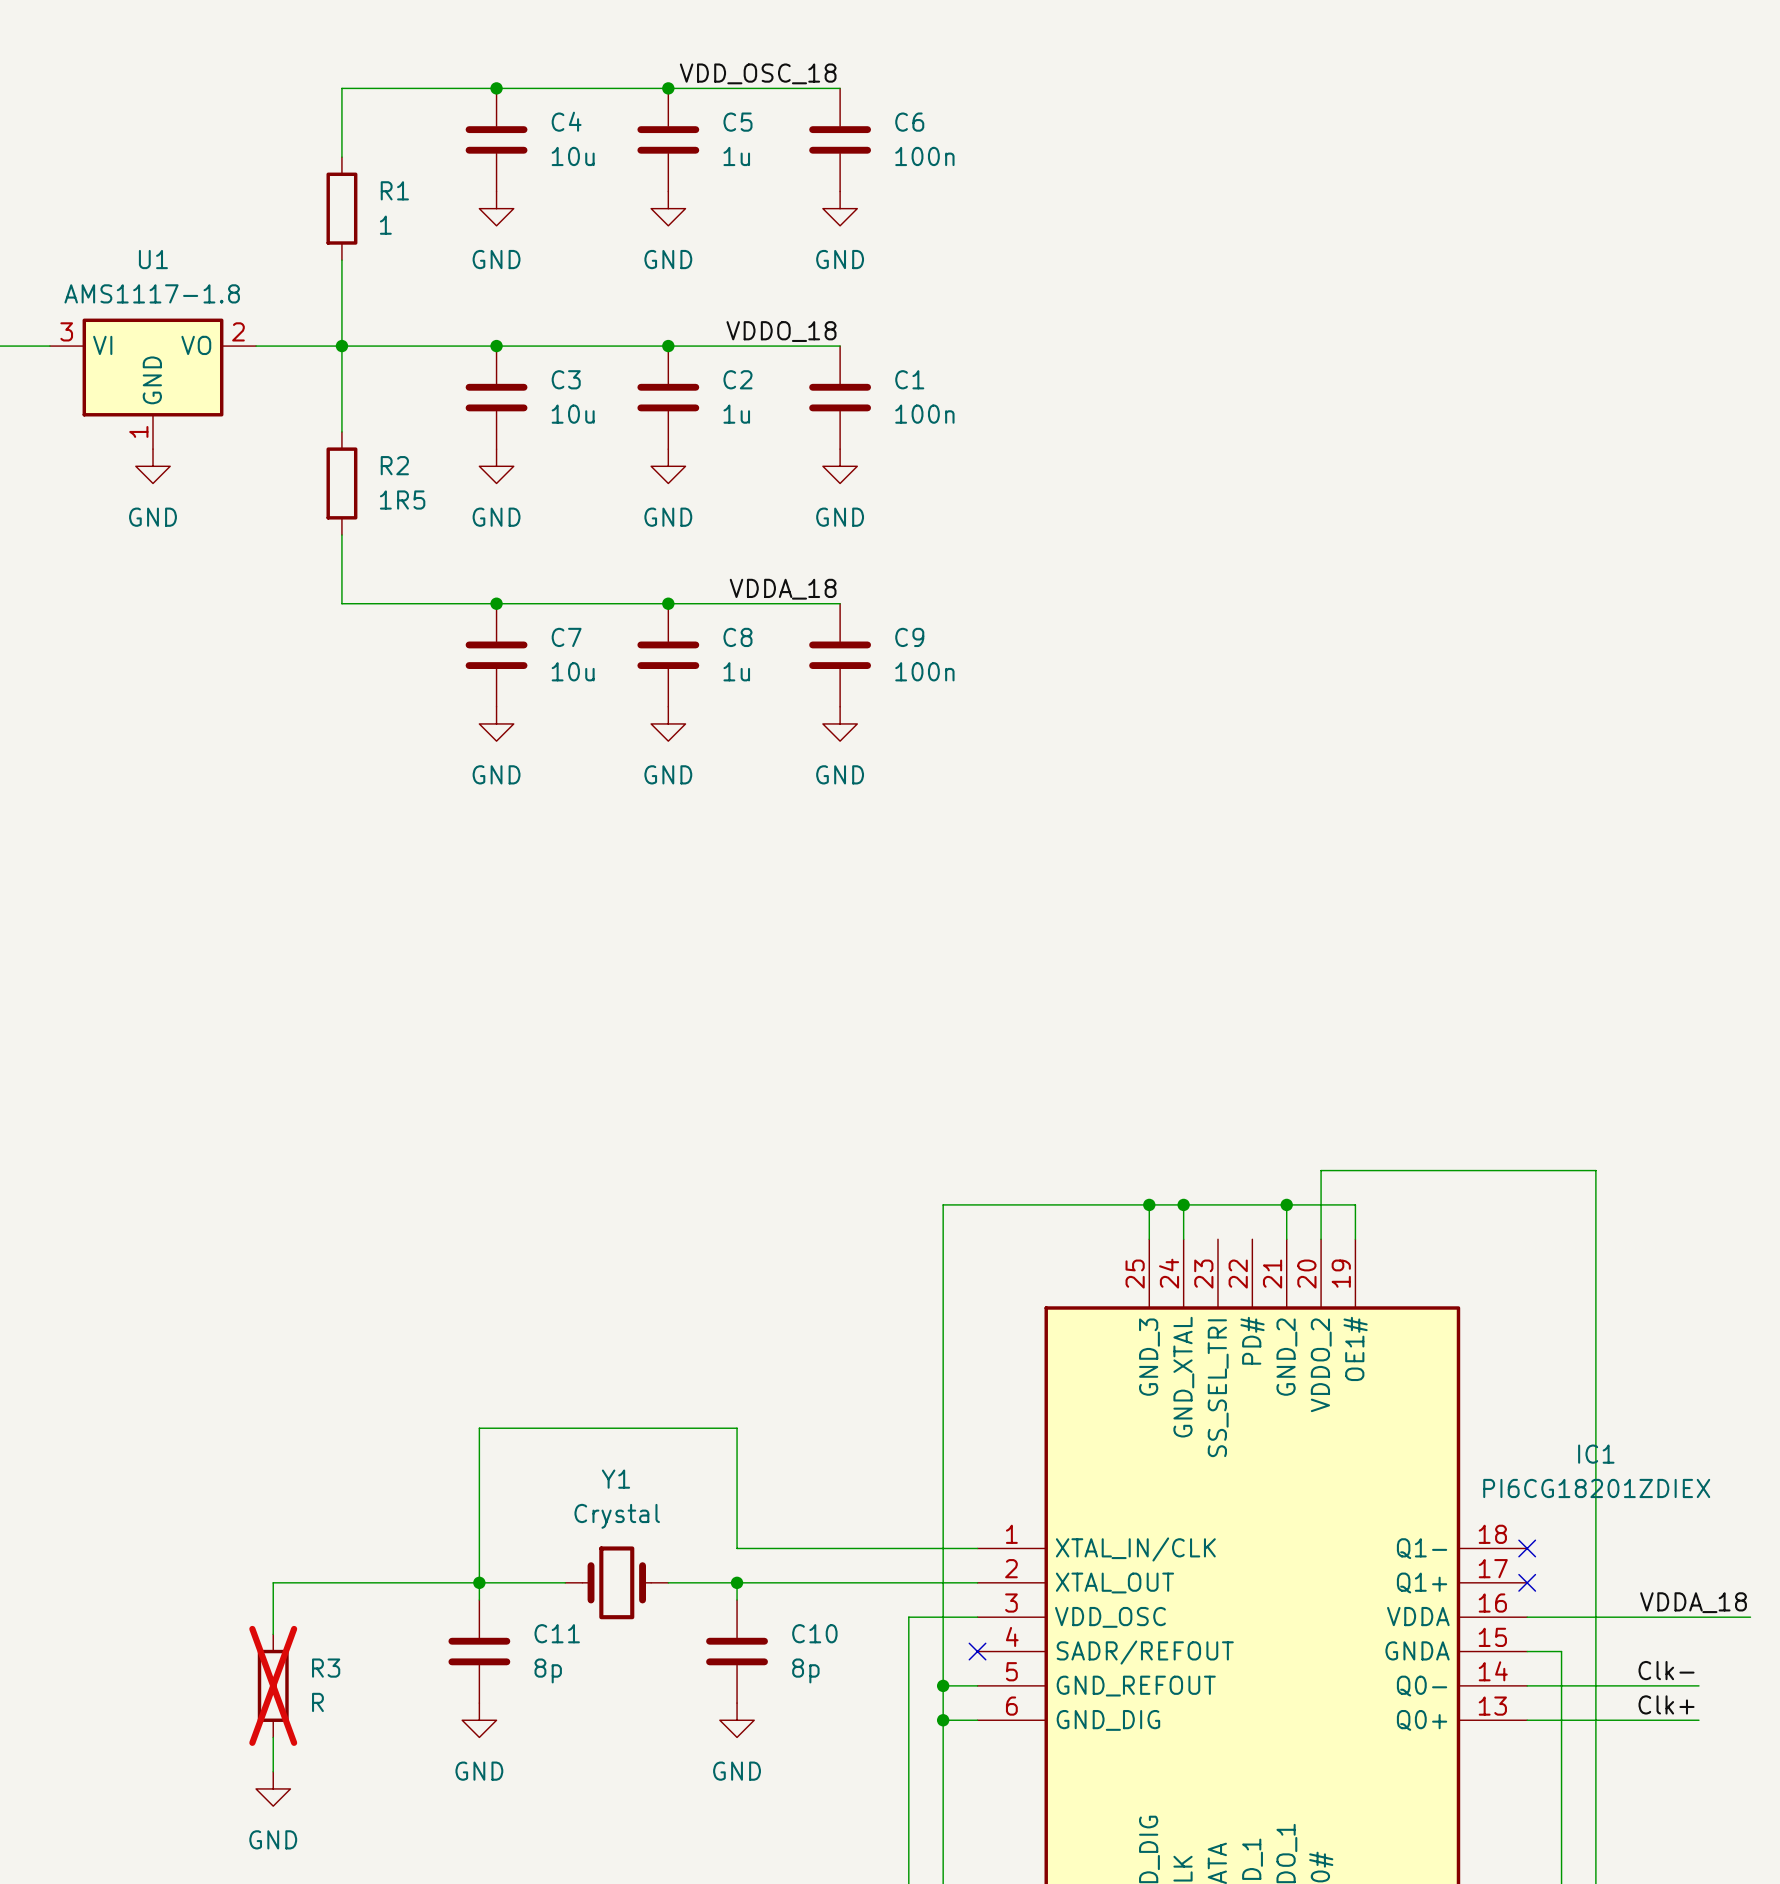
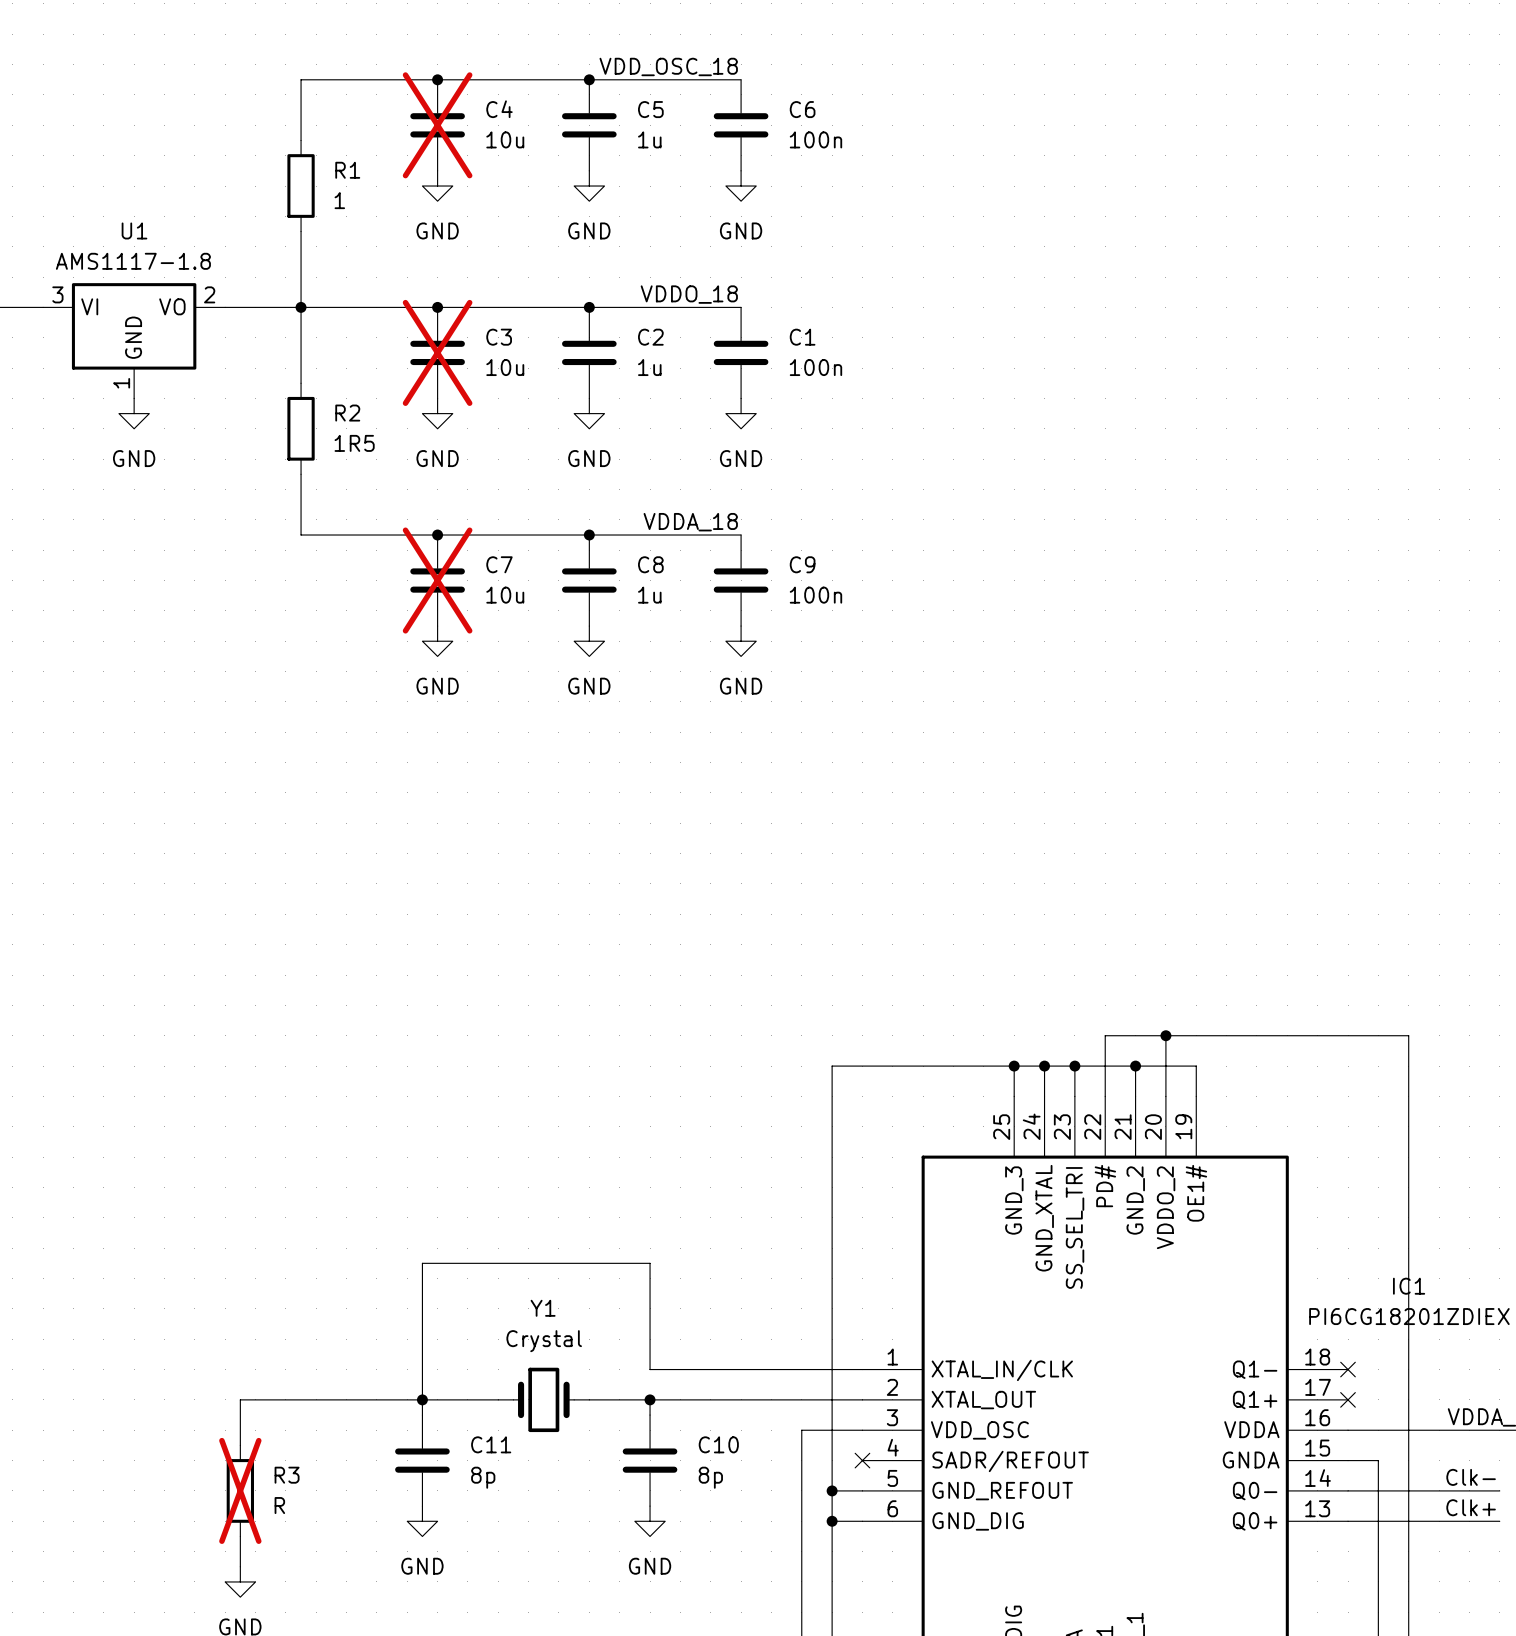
C4 do-not-place cross: none -> (437, 125)
C3 do-not-place cross: none -> (437, 352)
C7 do-not-place cross: none -> (437, 580)
wire: none -> (1165, 1035) (1105, 1035) (1105, 1096)
junction: none -> (1165, 1035)
wire: none -> (1074, 1066) (1074, 1096)
junction: none -> (1074, 1066)

